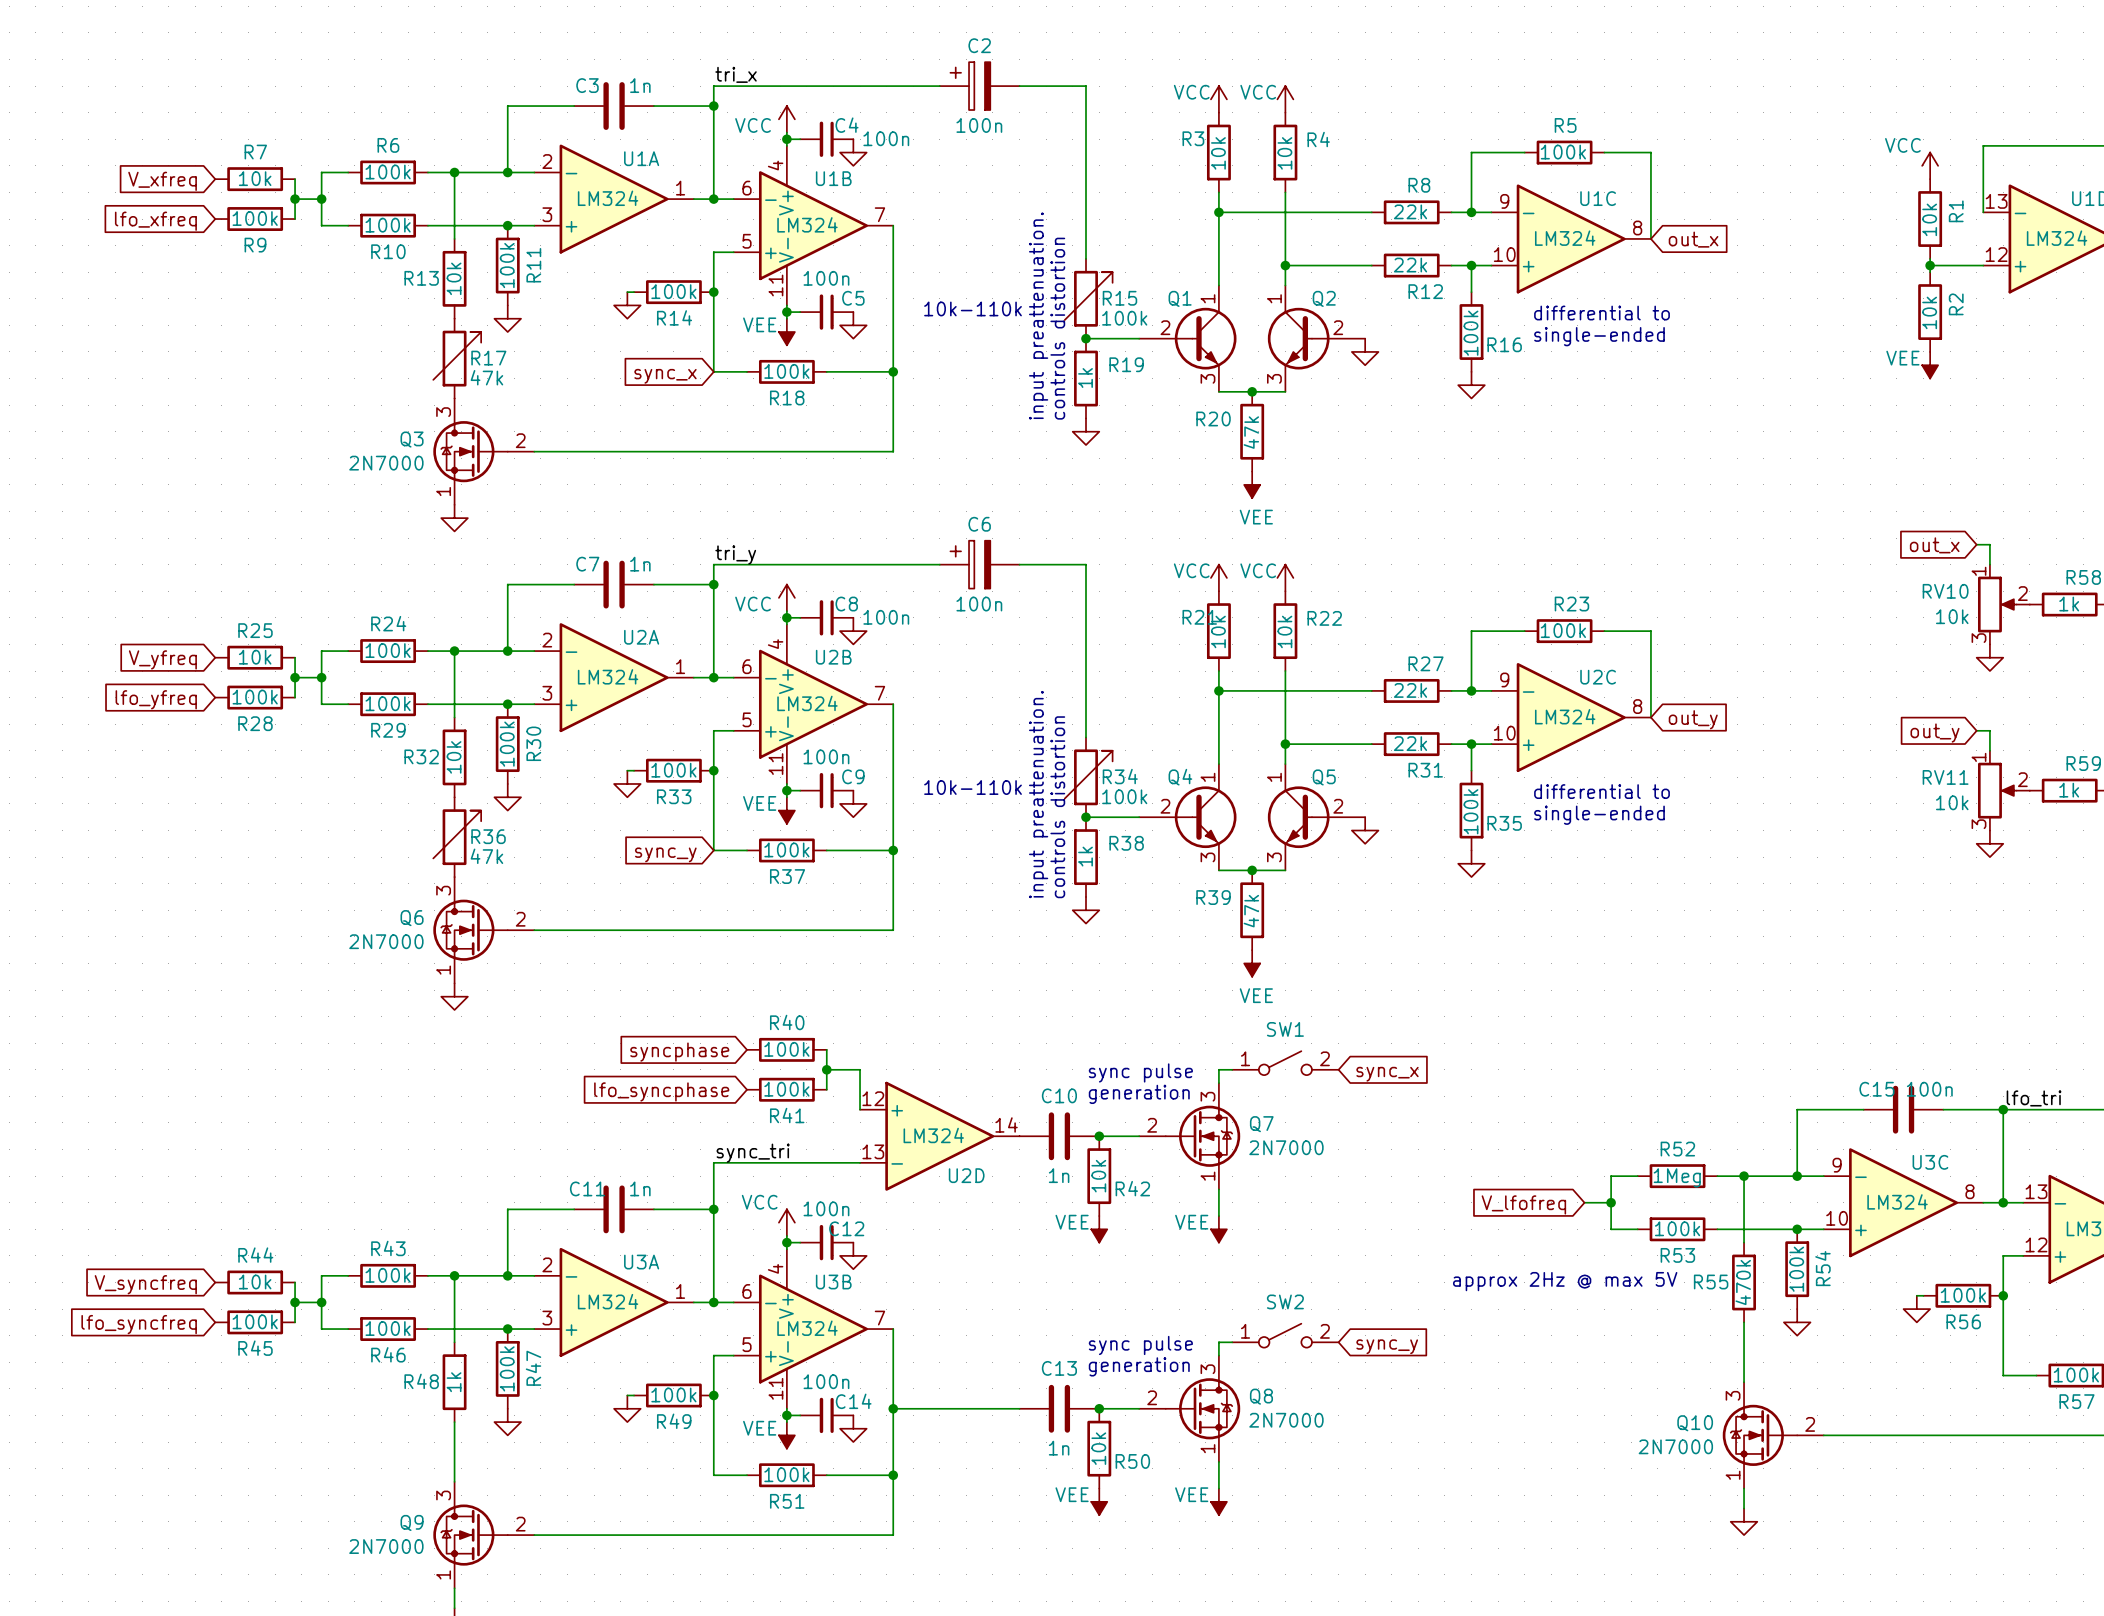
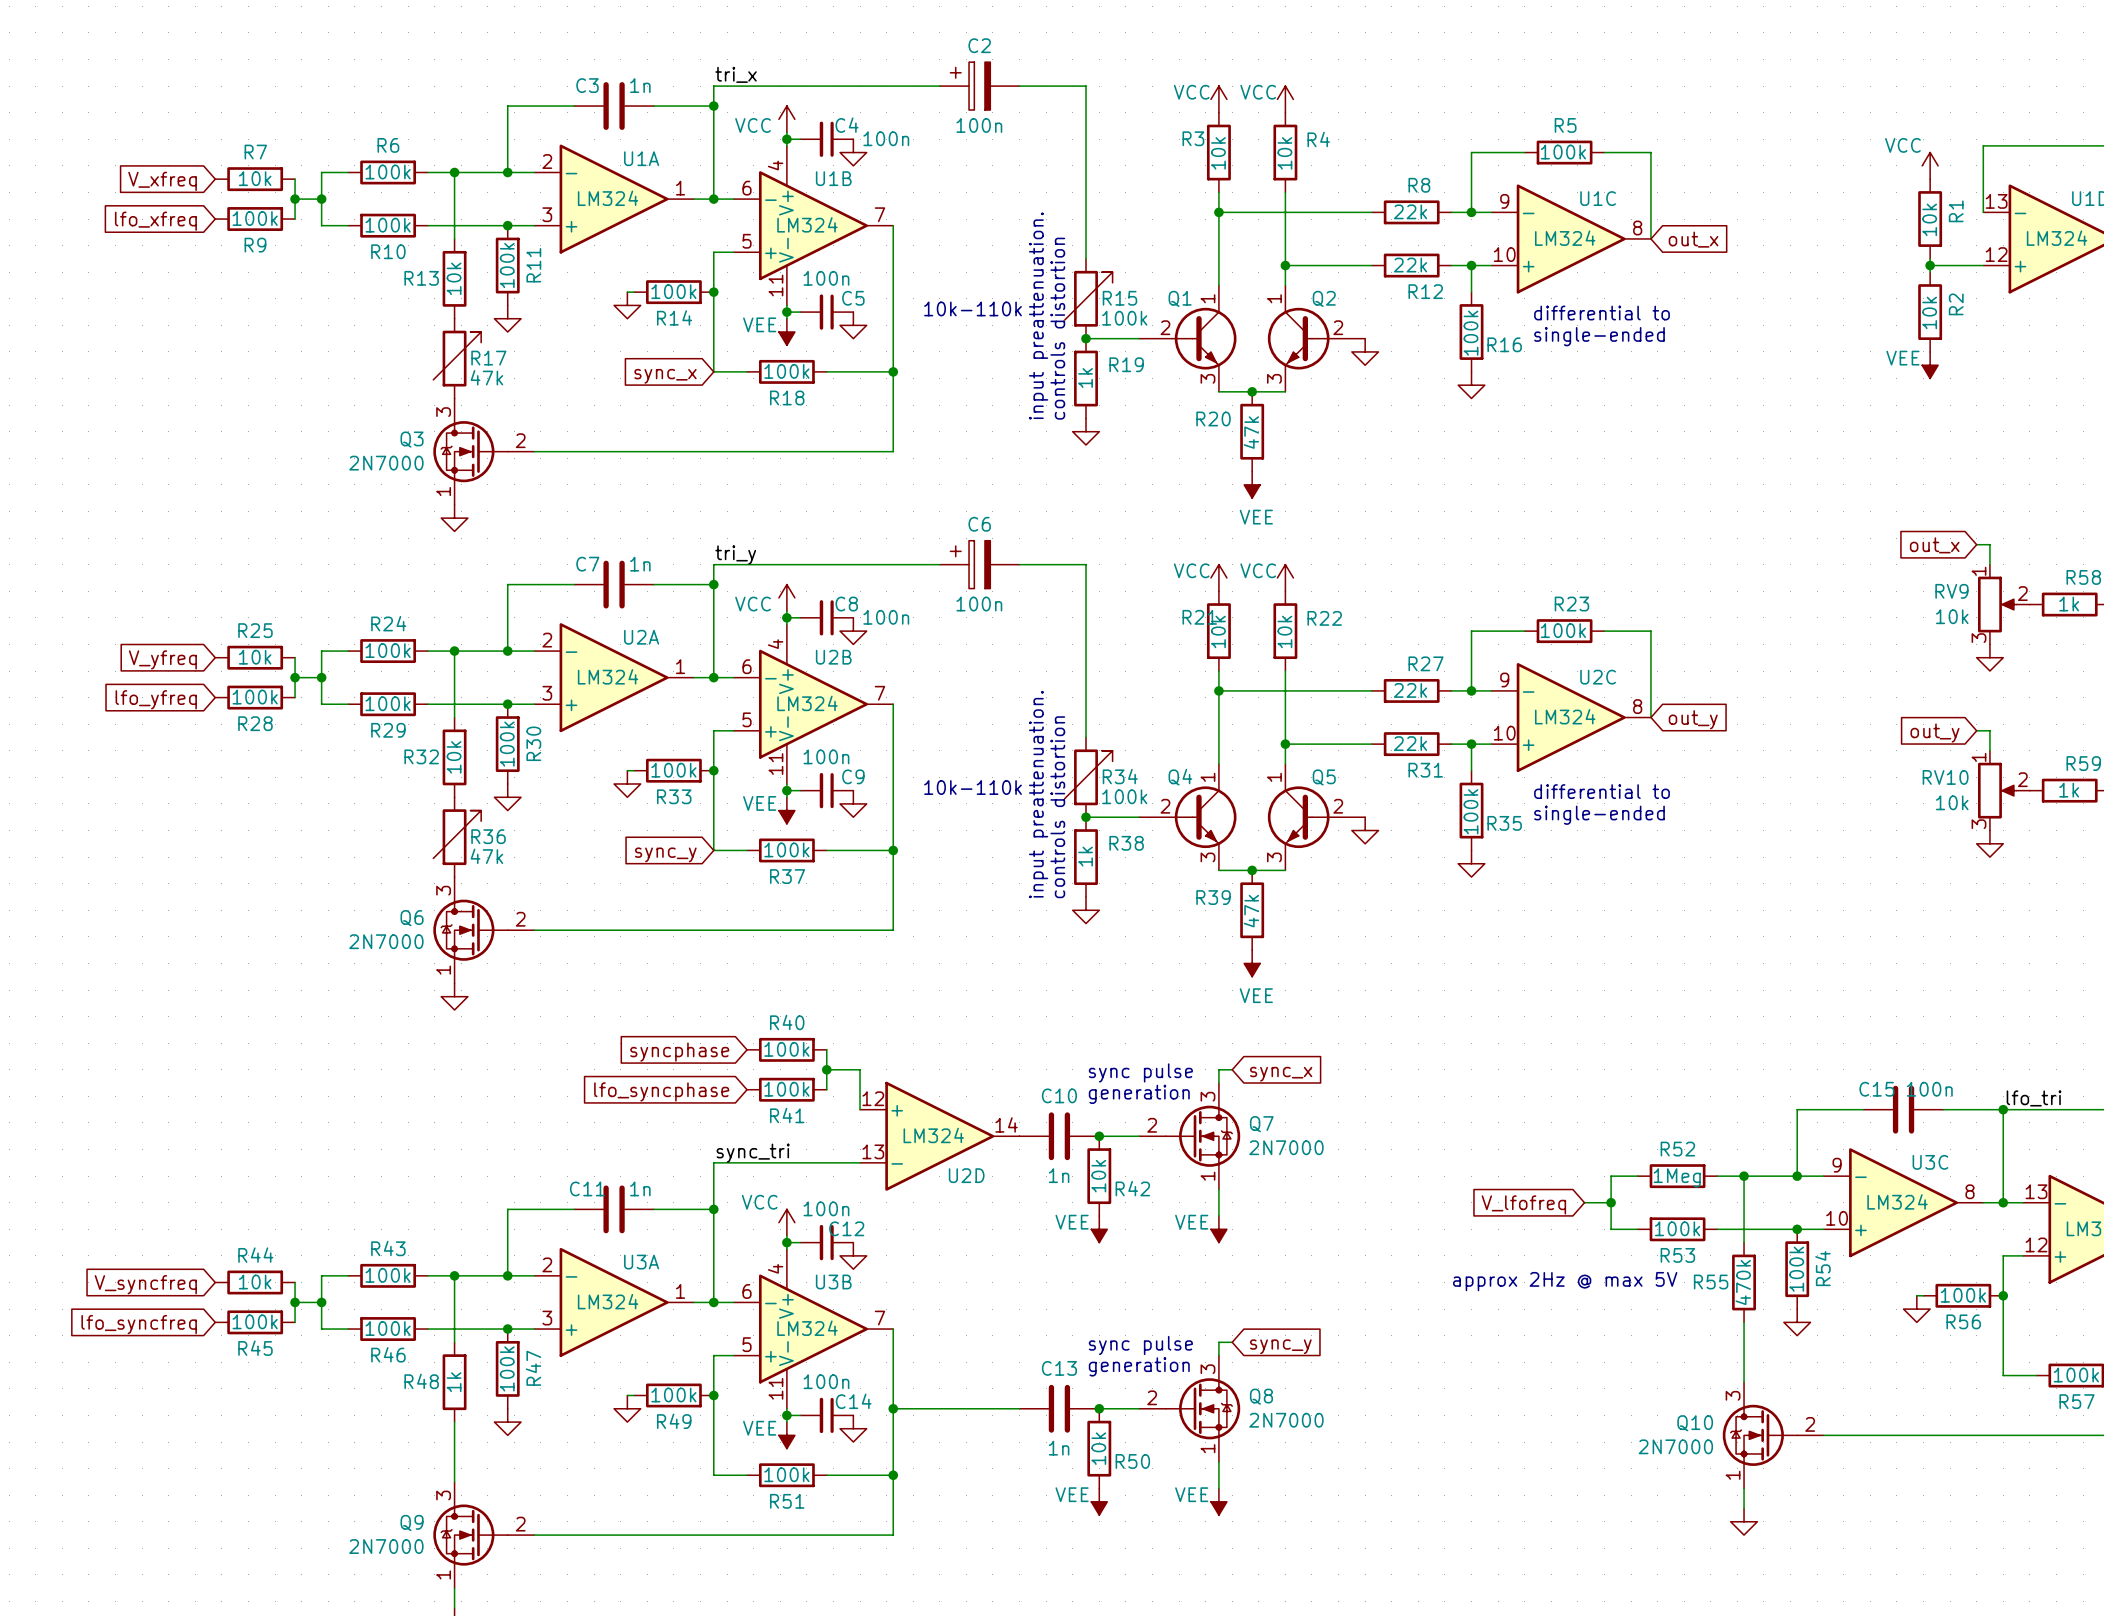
RV10 name: RV10 (1945, 591) -> RV9 (1951, 591)
RV11 name: RV11 (1945, 777) -> RV10 (1945, 777)
SW1: (1285, 1063) -> none
global label position: sync_x (1387, 1074) -> sync_x (1281, 1074)
SW2: (1285, 1335) -> none
global label position: sync_y (1387, 1346) -> sync_y (1280, 1346)

